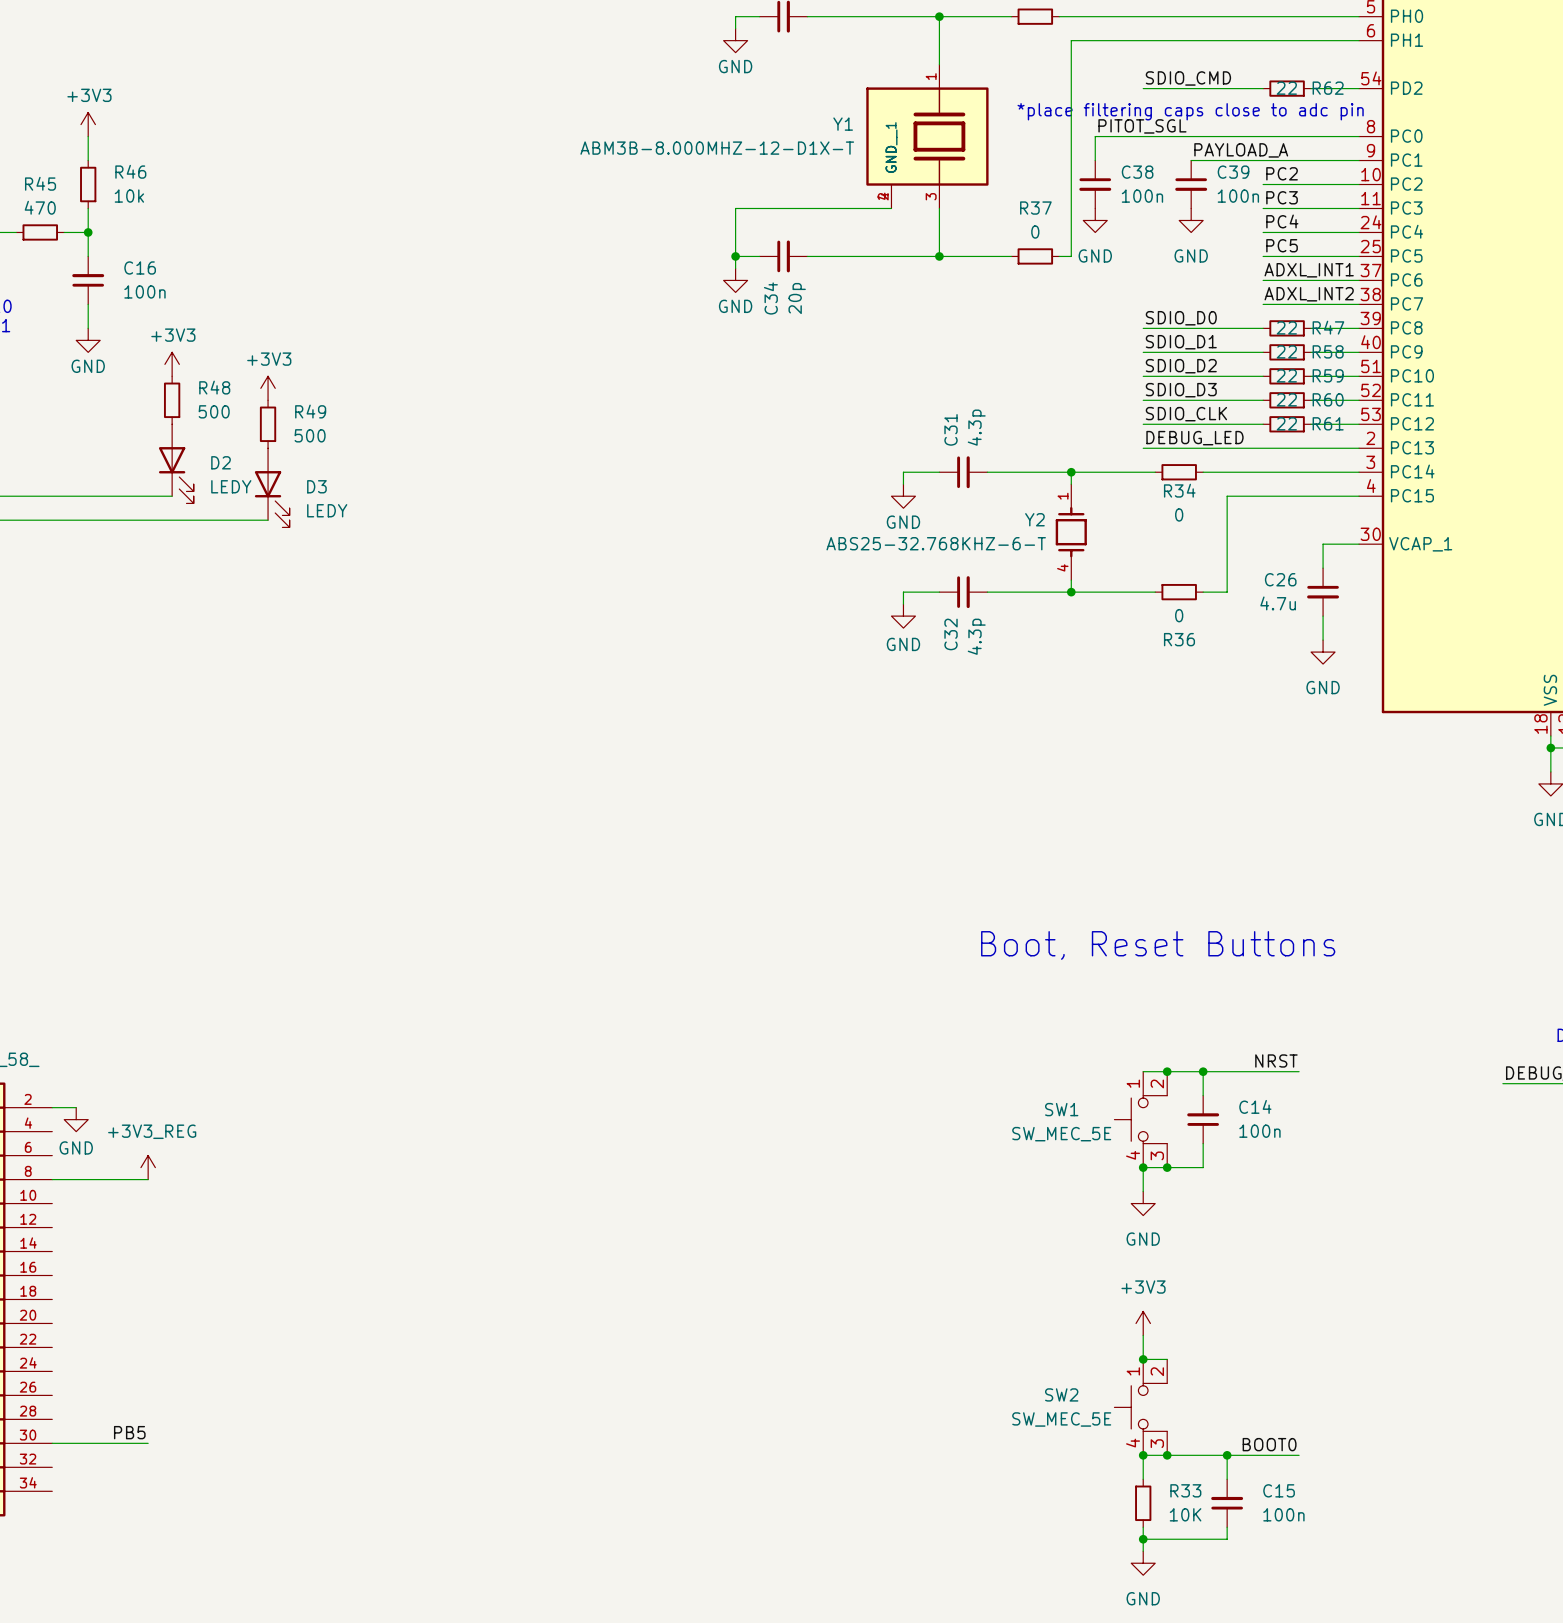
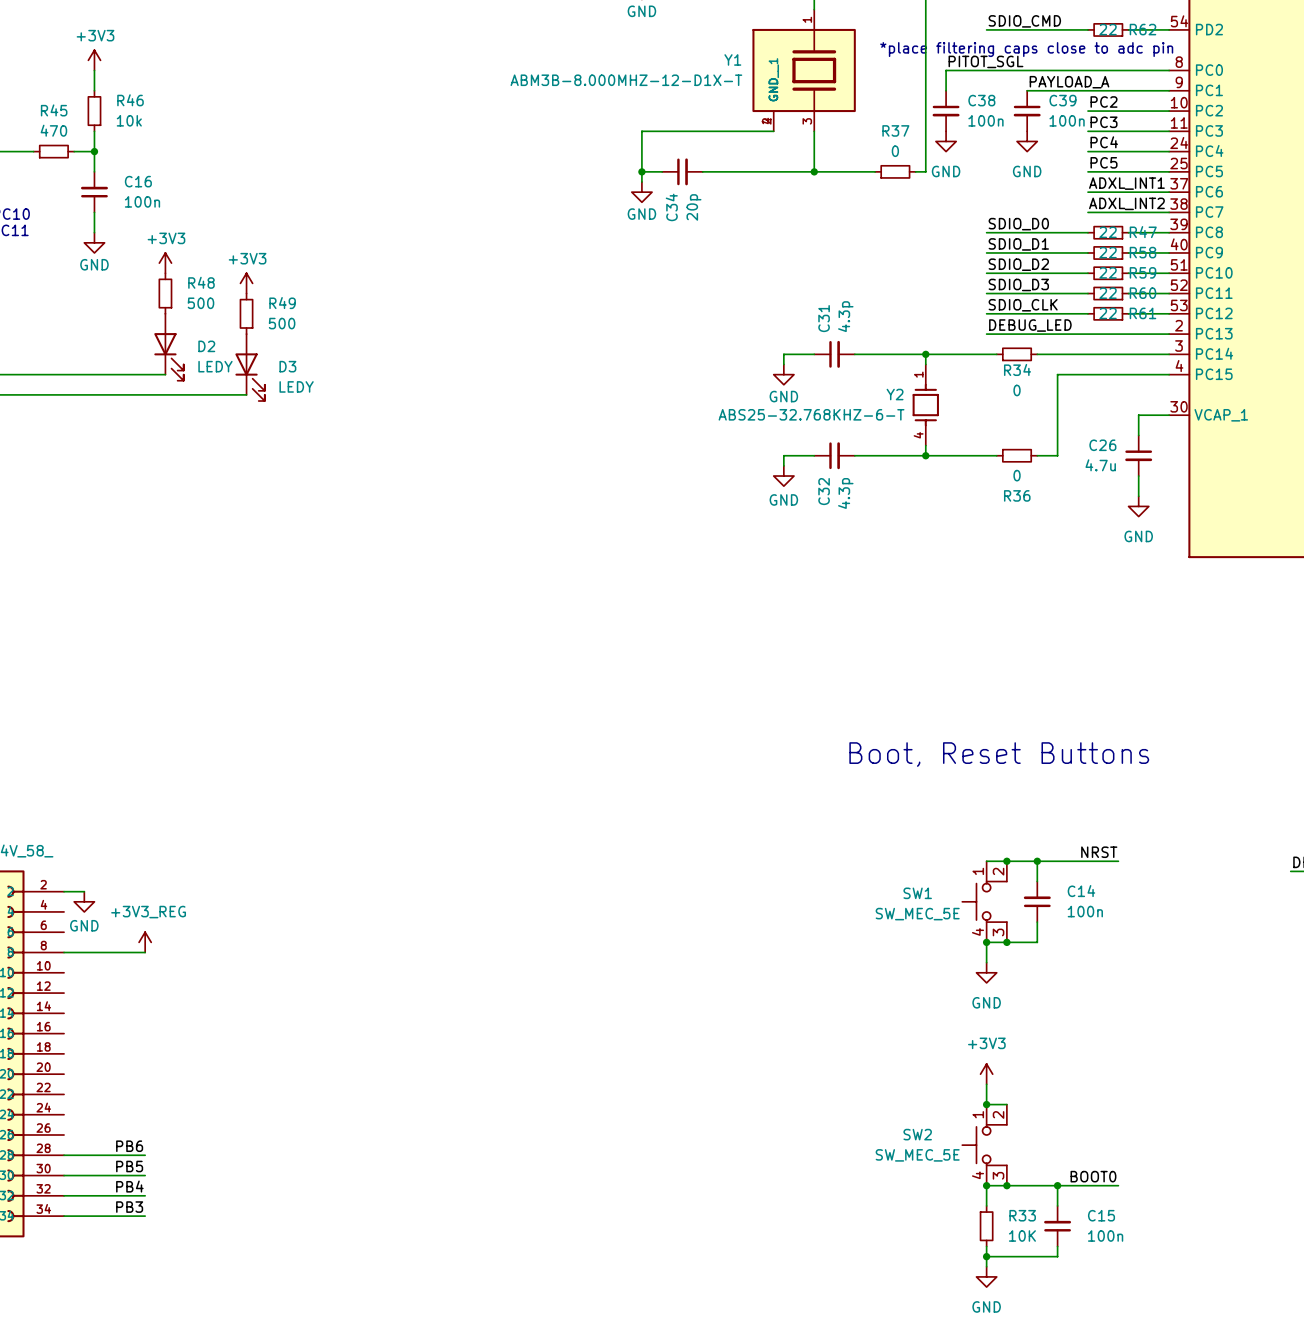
label: none -> PB6 (129, 1146)
wire: none -> (64, 1155) (145, 1155)
label: none -> PB4 (129, 1186)
wire: none -> (64, 1195) (145, 1195)
label: none -> PB3 (129, 1207)
wire: none -> (64, 1216) (145, 1216)

